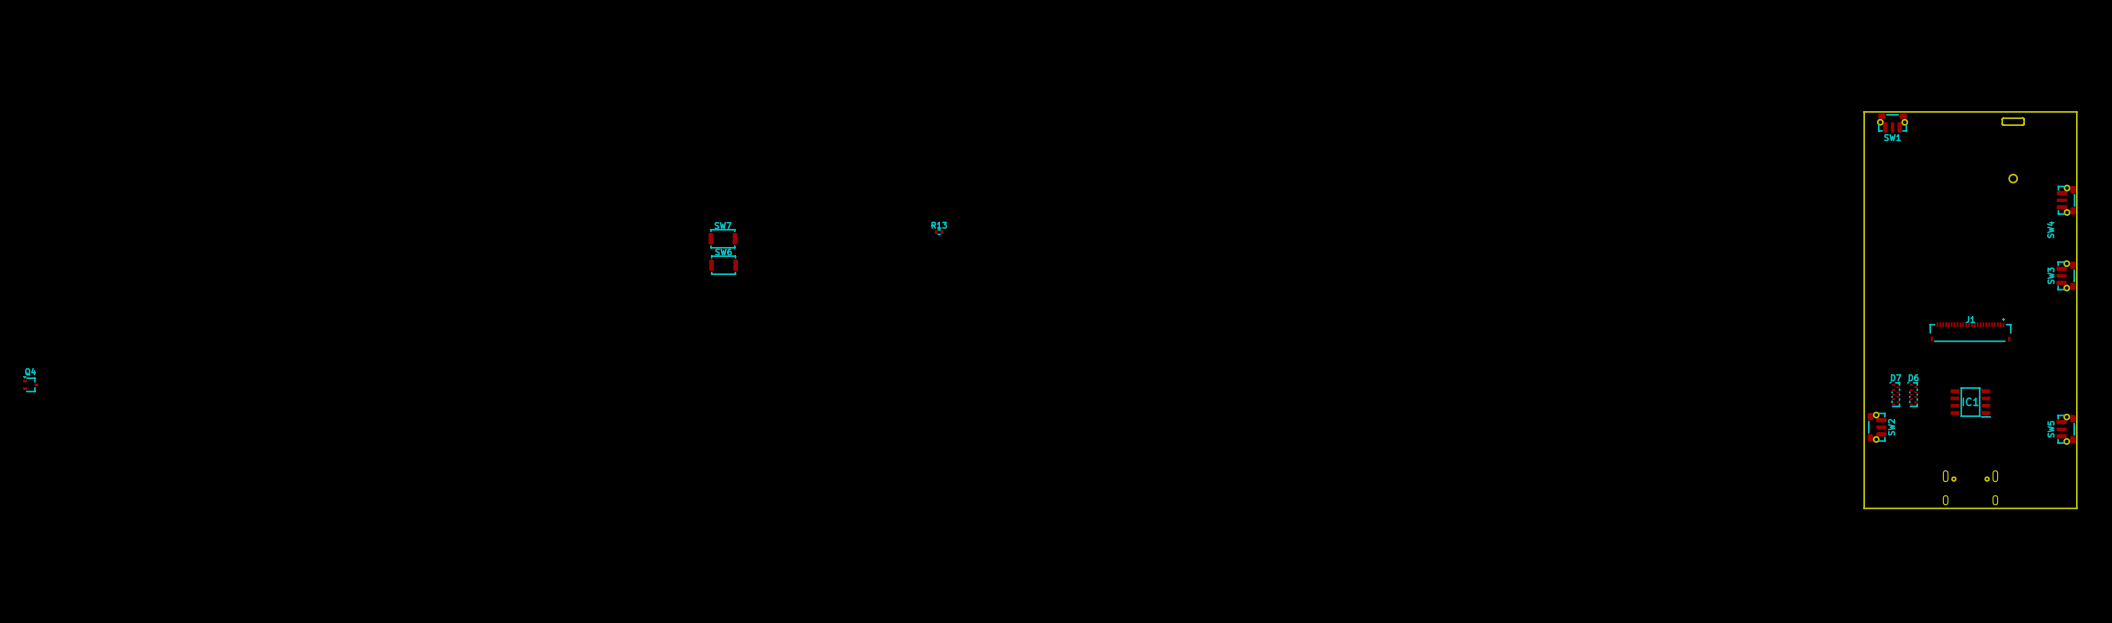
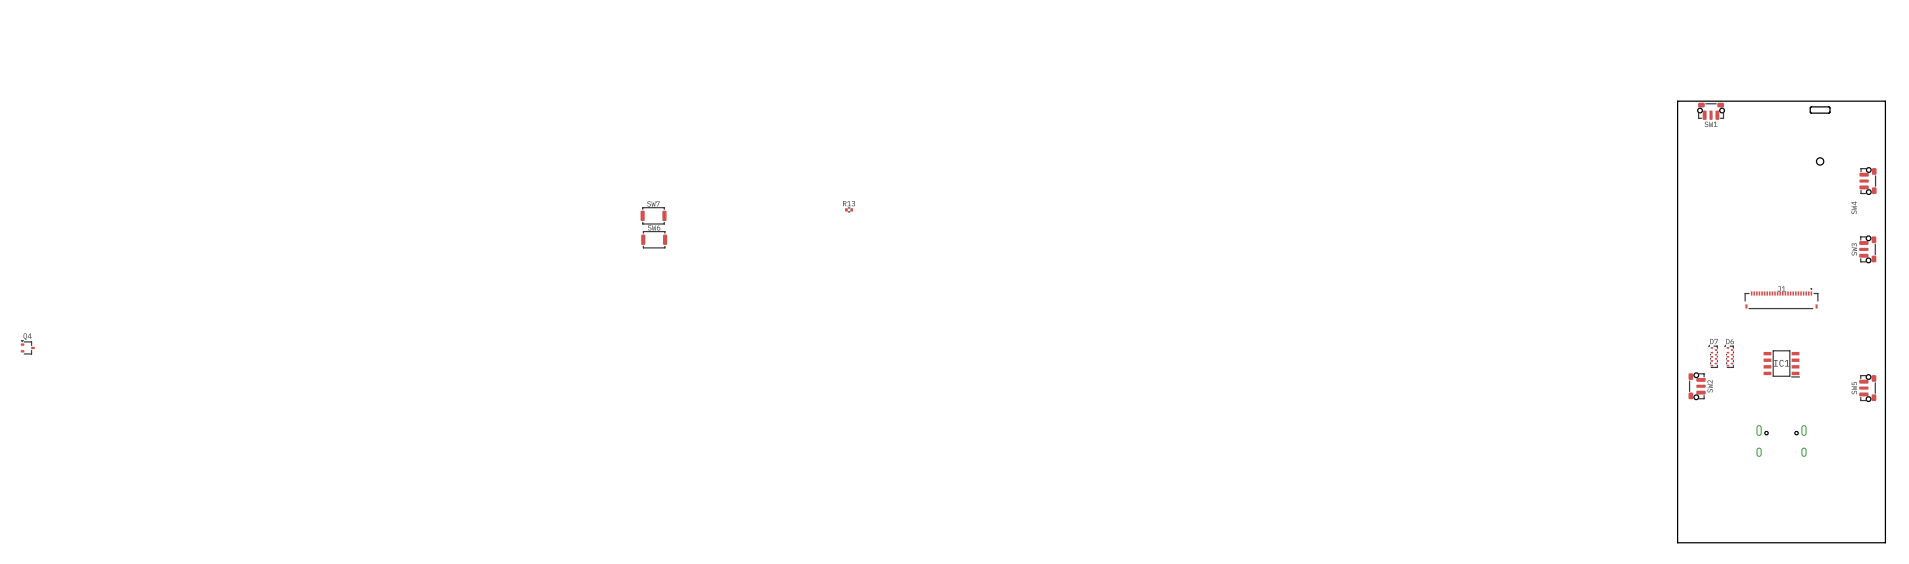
board edge: (1864, 111) (1864, 508) (2076, 508) (2076, 111) -> (1685, 101) (1677, 101) (1677, 542) (1885, 542) (1885, 101) (1877, 101)

